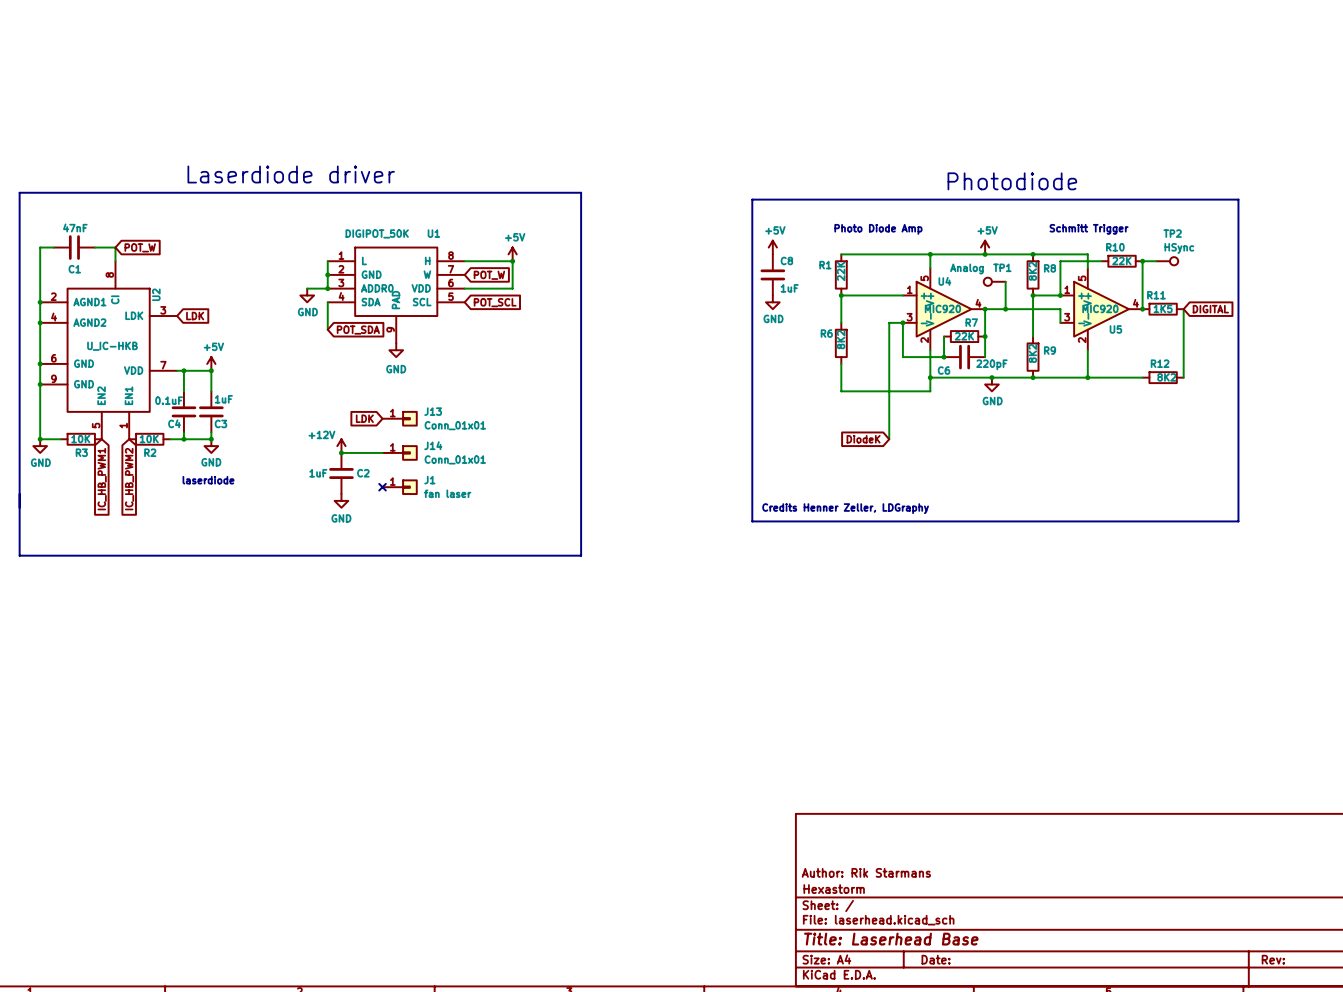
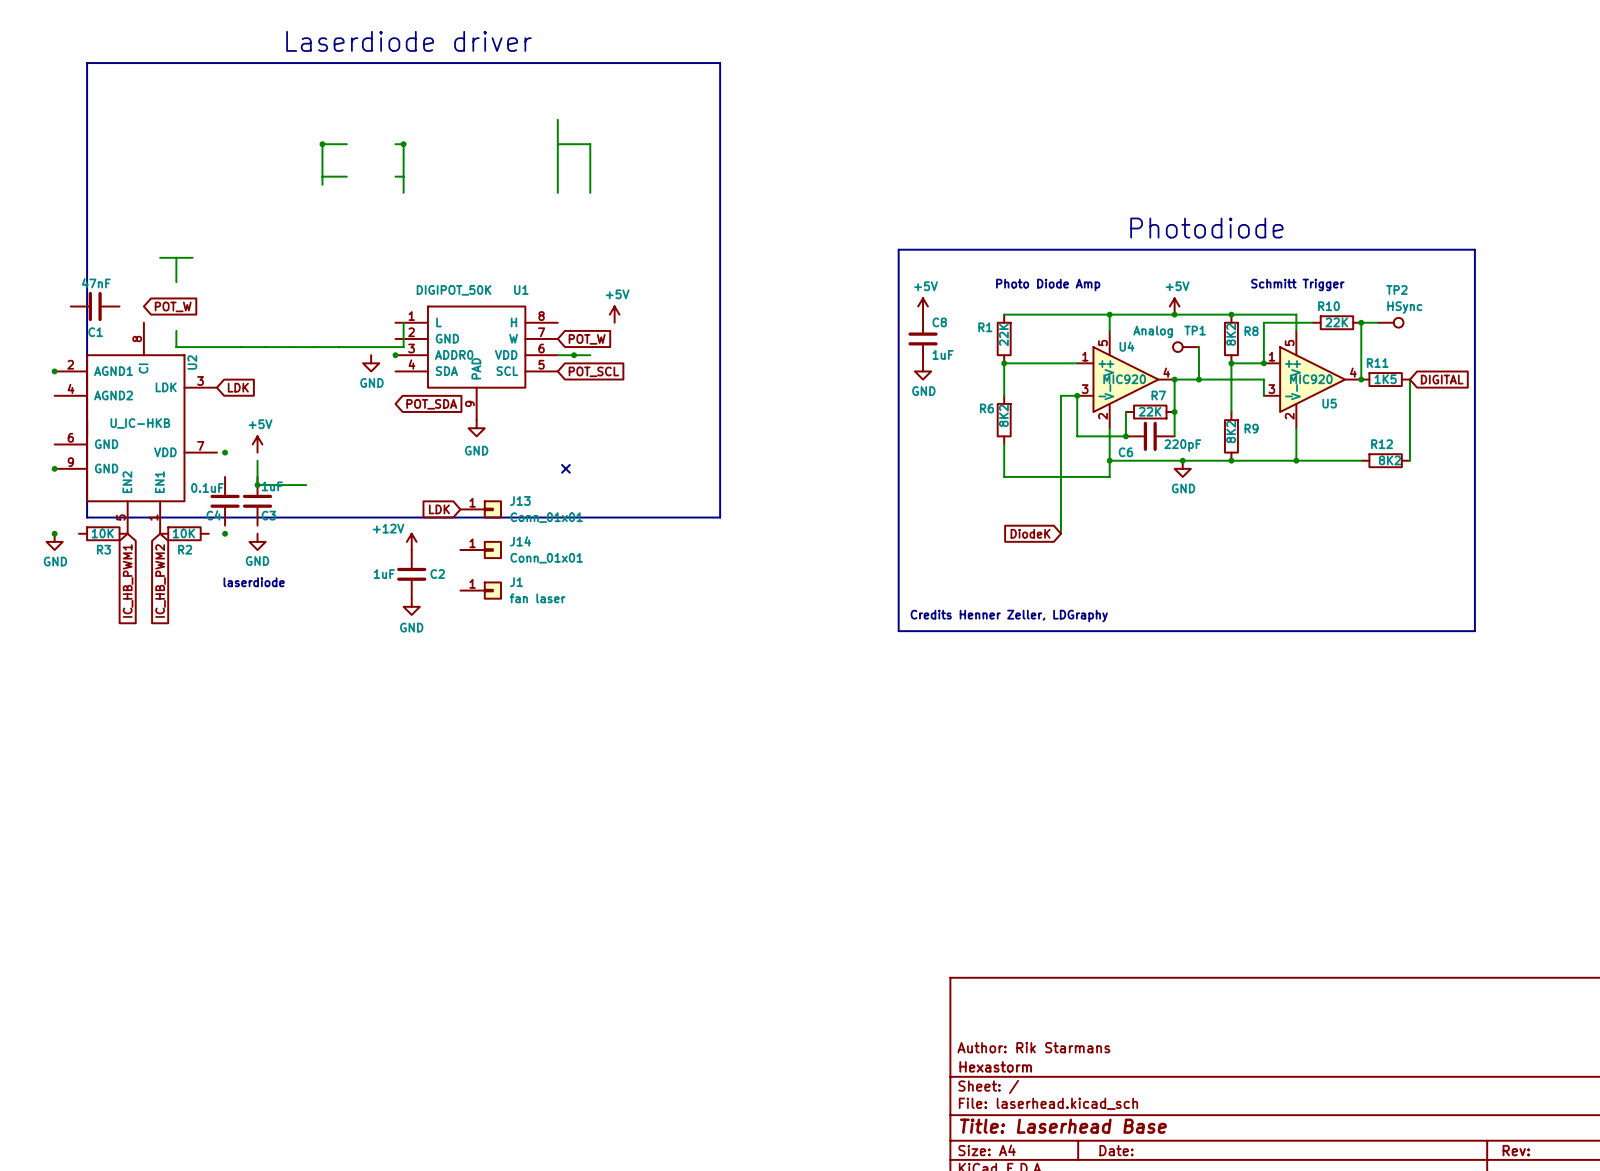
text: none -> Laserdiode driver (408, 41)
line: none -> (87, 63) (87, 517) (720, 517) (720, 63) (87, 63)
wire: none -> (557, 119) (557, 192)
junction: none -> (322, 144)
wire: none -> (346, 144) (322, 144) (322, 184)
wire: none -> (395, 144) (403, 144) (403, 192)
junction: none -> (403, 144)
wire: none -> (557, 144) (590, 144) (590, 192)
wire: none -> (322, 176) (346, 176)
wire: none -> (395, 176) (403, 176)
text: Laserdiode driver (291, 174) -> none
line: (19, 192) (19, 555) (581, 555) (581, 192) (19, 192) -> none
wire: none -> (160, 257) (192, 257)
wire: none -> (176, 257) (176, 282)
wire: (53, 247) (40, 247) (40, 439) (60, 439) -> none
wire: (94, 247) (115, 247) (115, 261) -> none
wire: (327, 261) (327, 288) (307, 288) -> none
wire: none -> (403, 322) (403, 347) (176, 347) (176, 330)
wire: (464, 261) (512, 261) (512, 288) (492, 288) -> none
junction: (512, 261) -> none
junction: (327, 274) -> none
junction: none -> (574, 355)
wire: (327, 302) (327, 329) -> none
junction: (40, 322) -> none
junction: (40, 363) -> none
wire: (177, 370) (211, 370) (211, 377) -> none
wire: (183, 370) (183, 391) -> none
junction: (211, 370) -> none
no-connect mark: none -> (565, 468)
wire: none -> (257, 476) (257, 485) (306, 485)
junction: none -> (257, 485)
wire: (183, 432) (183, 439) -> none
wire: (211, 432) (211, 439) (170, 439) -> none
junction: (211, 439) -> none
wire: (341, 452) (382, 452) -> none
junction: (341, 452) -> none
no-connect mark: (382, 487) -> none

